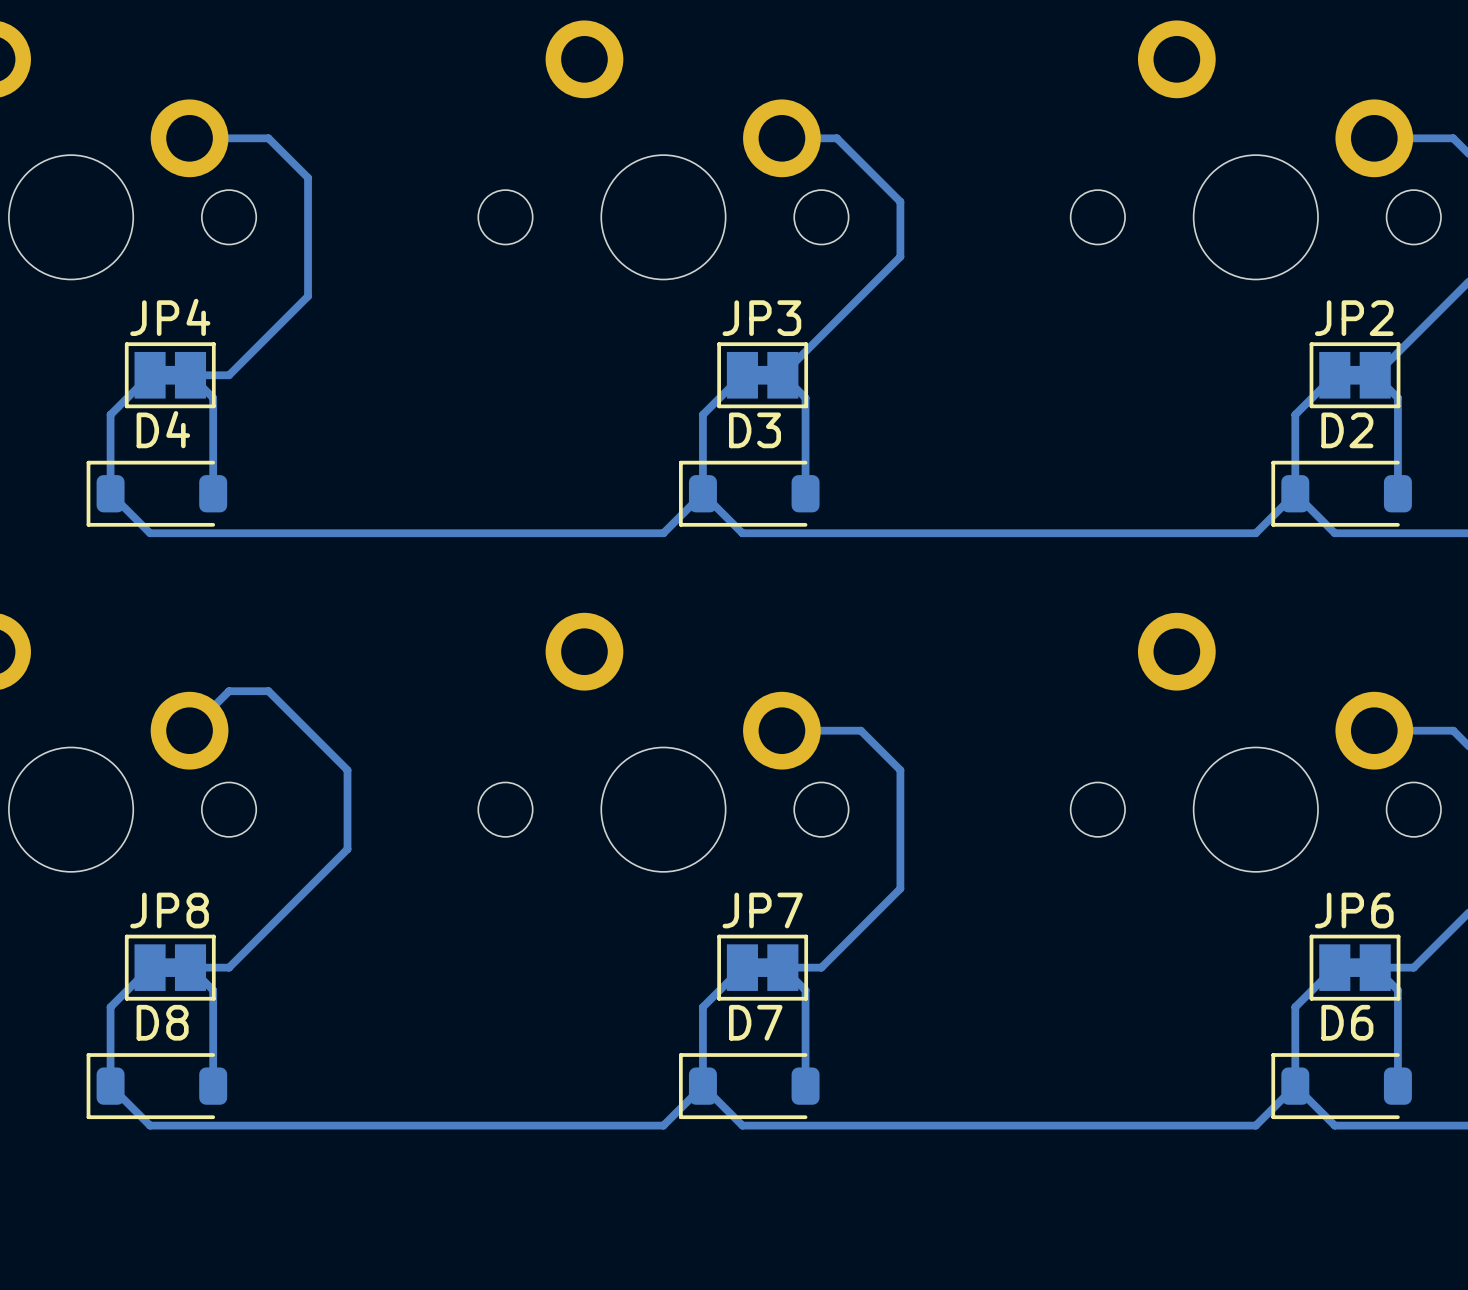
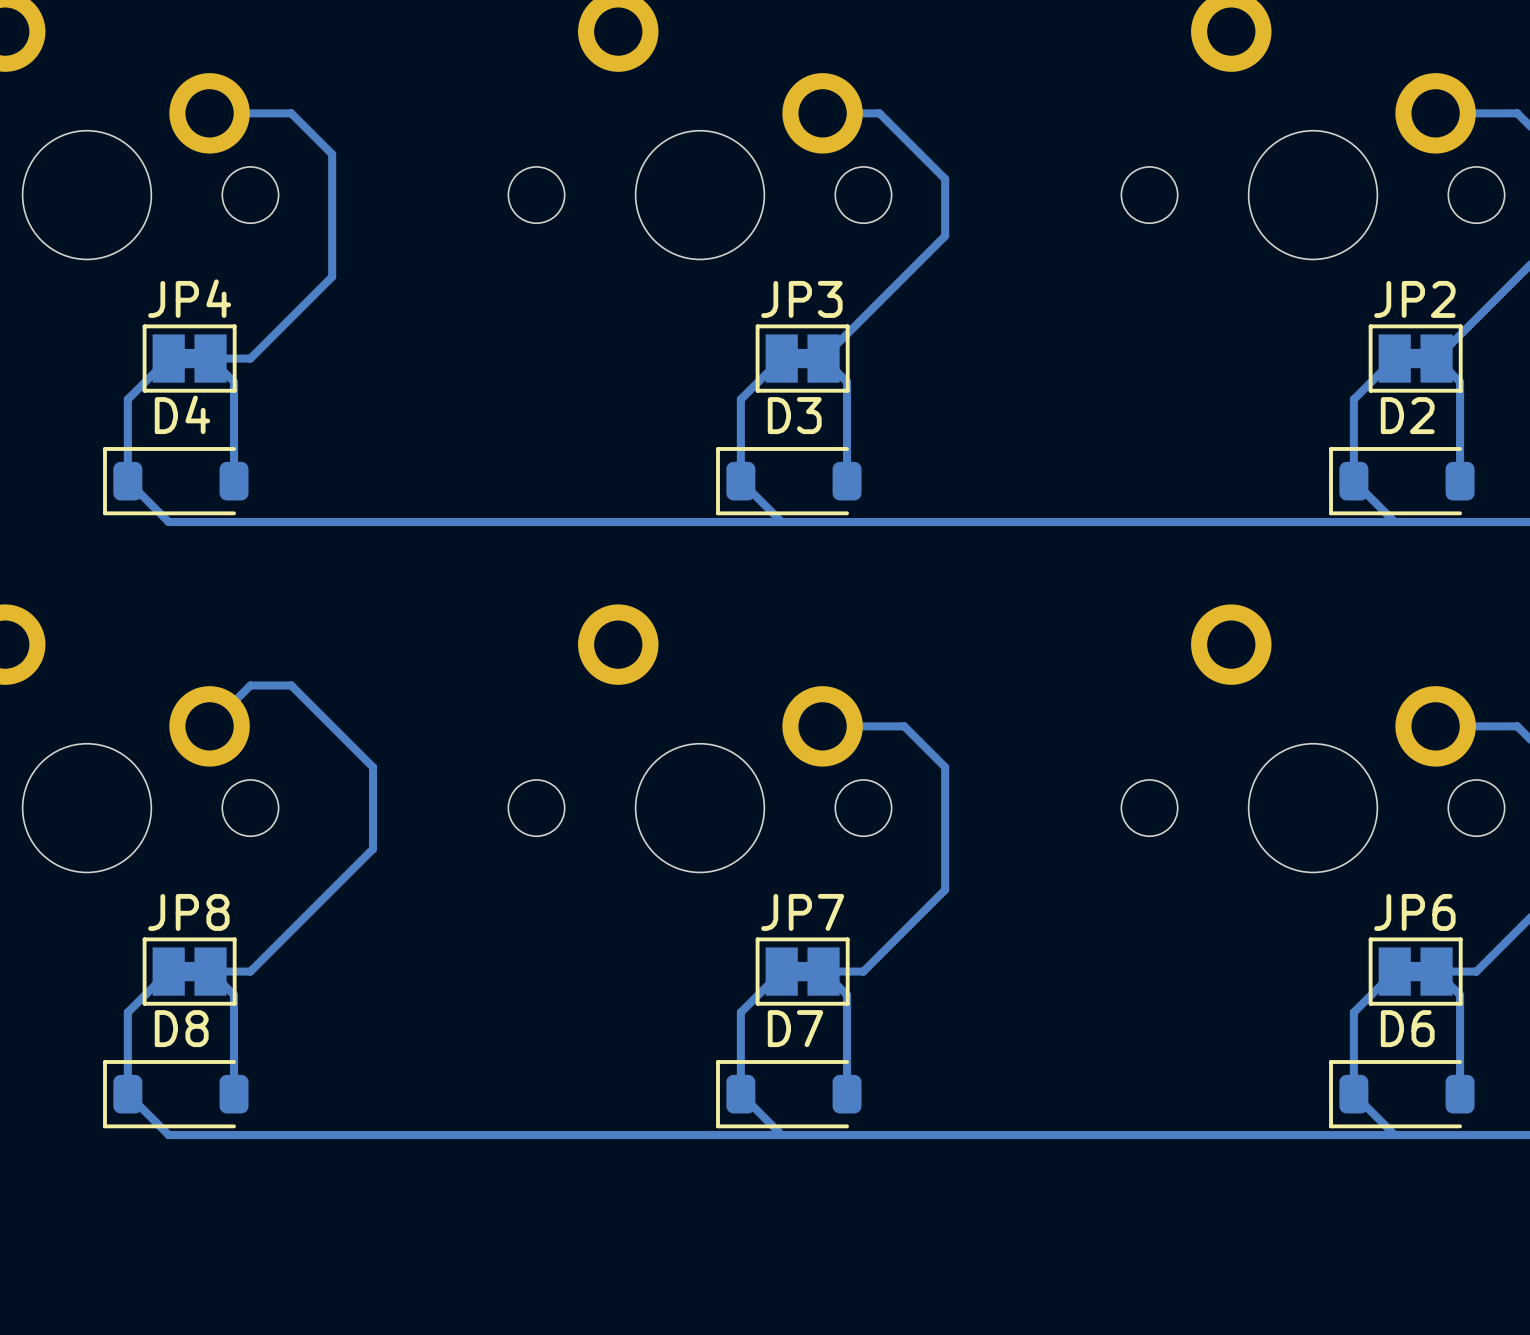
track: (702, 493) (663, 533) -> (781, 522) (699, 522)
track: (1295, 493) (1255, 533) -> (1394, 522) (1313, 522)
track: (702, 1086) (663, 1125) -> (781, 1135) (699, 1135)
track: (1295, 1086) (1255, 1125) -> (1394, 1135) (1313, 1135)

